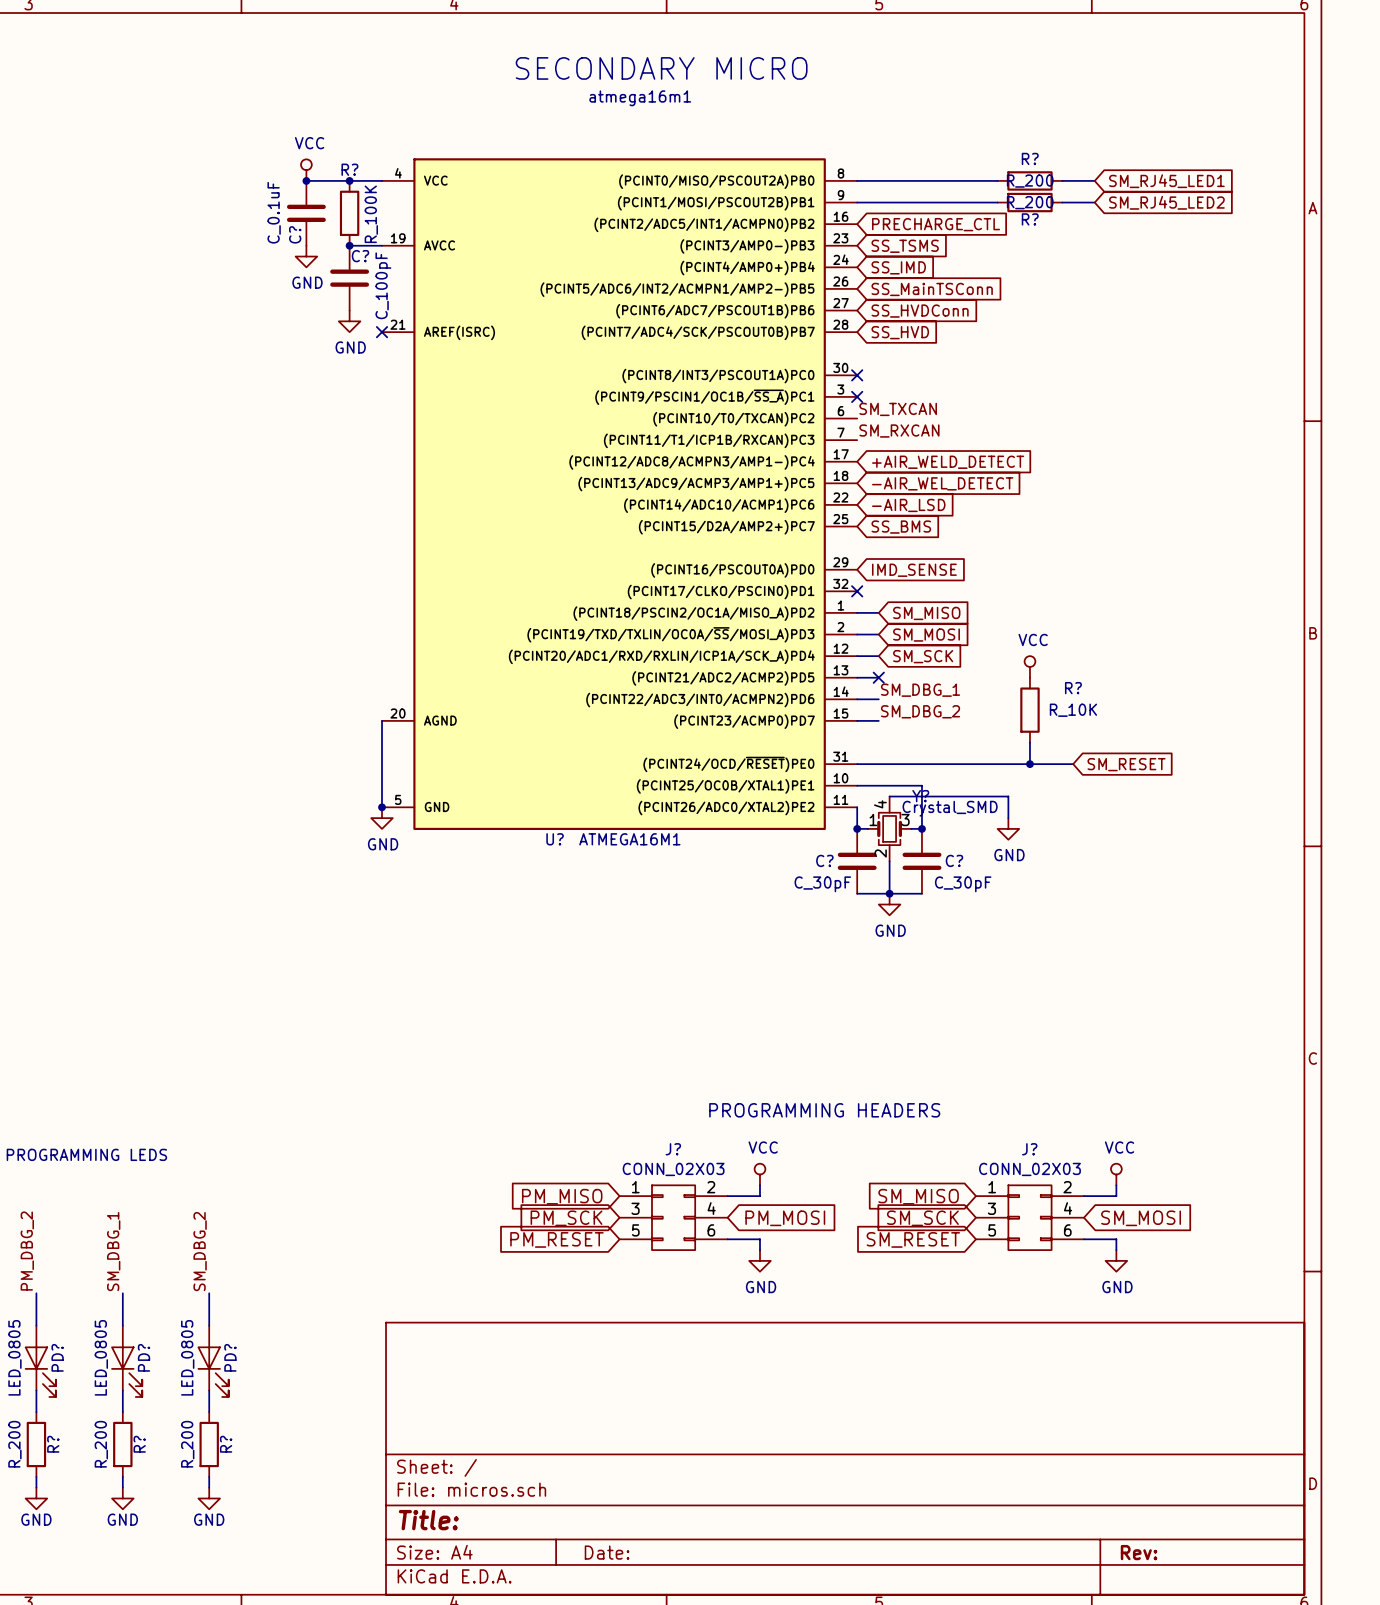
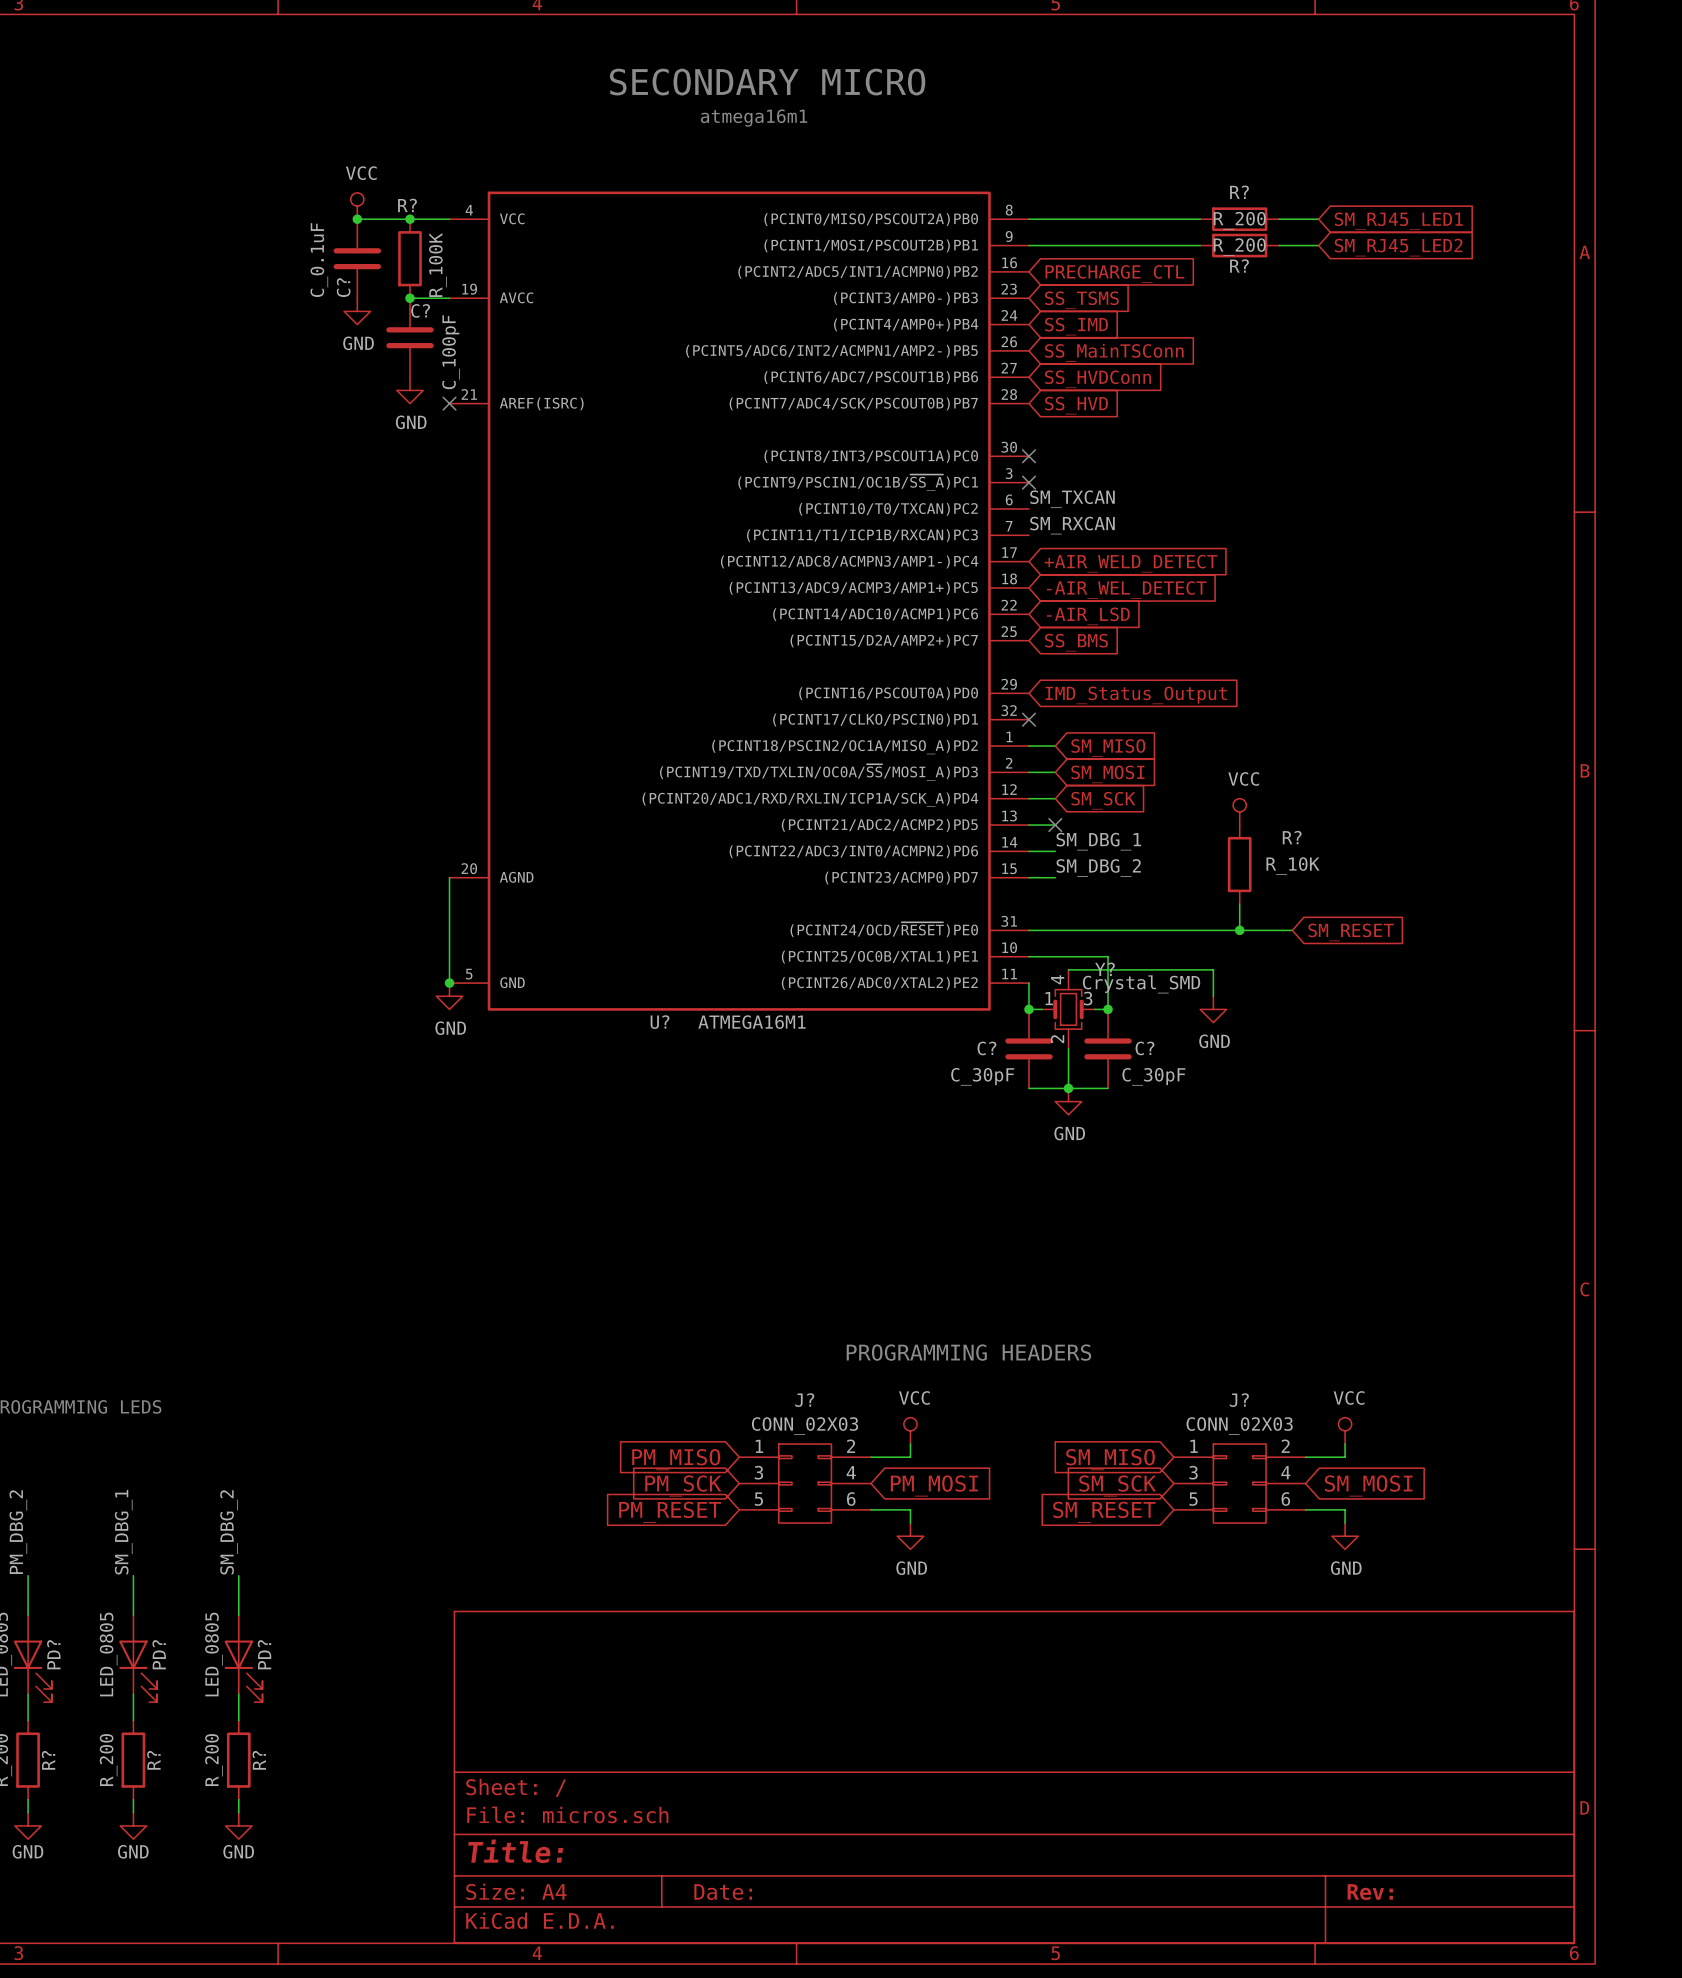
global label: IMD_SENSE (914, 570) -> IMD_Status_Output (1136, 695)

